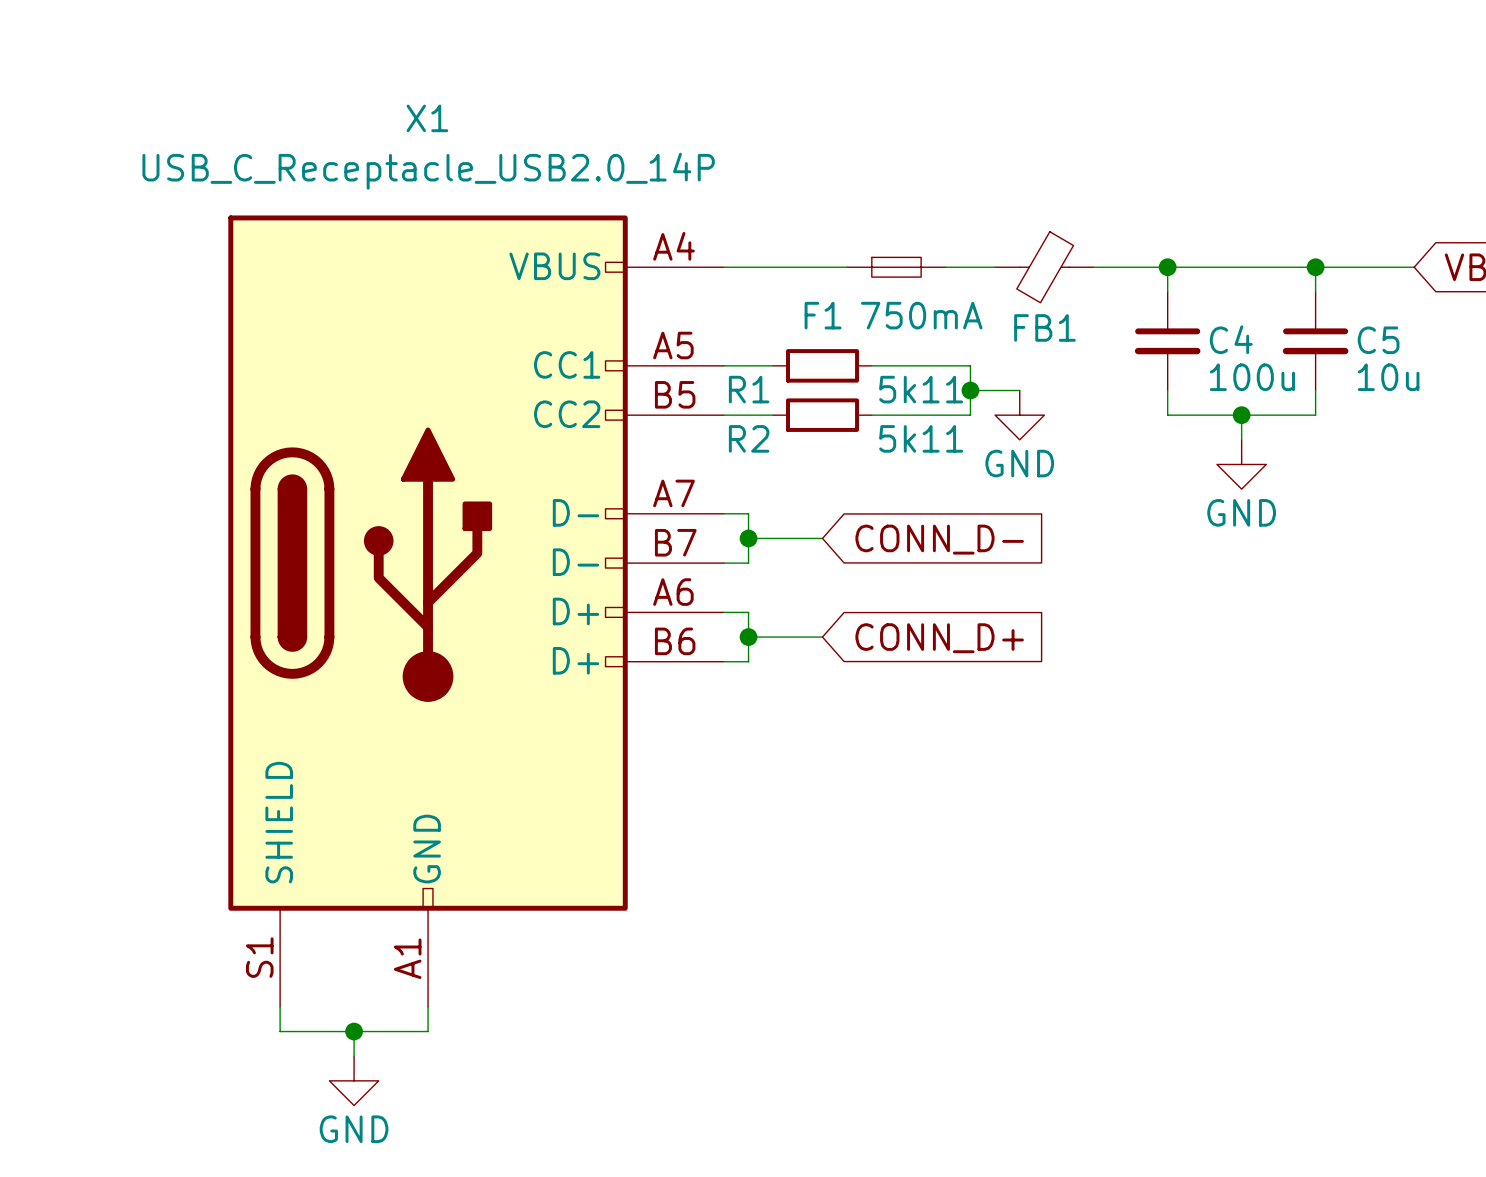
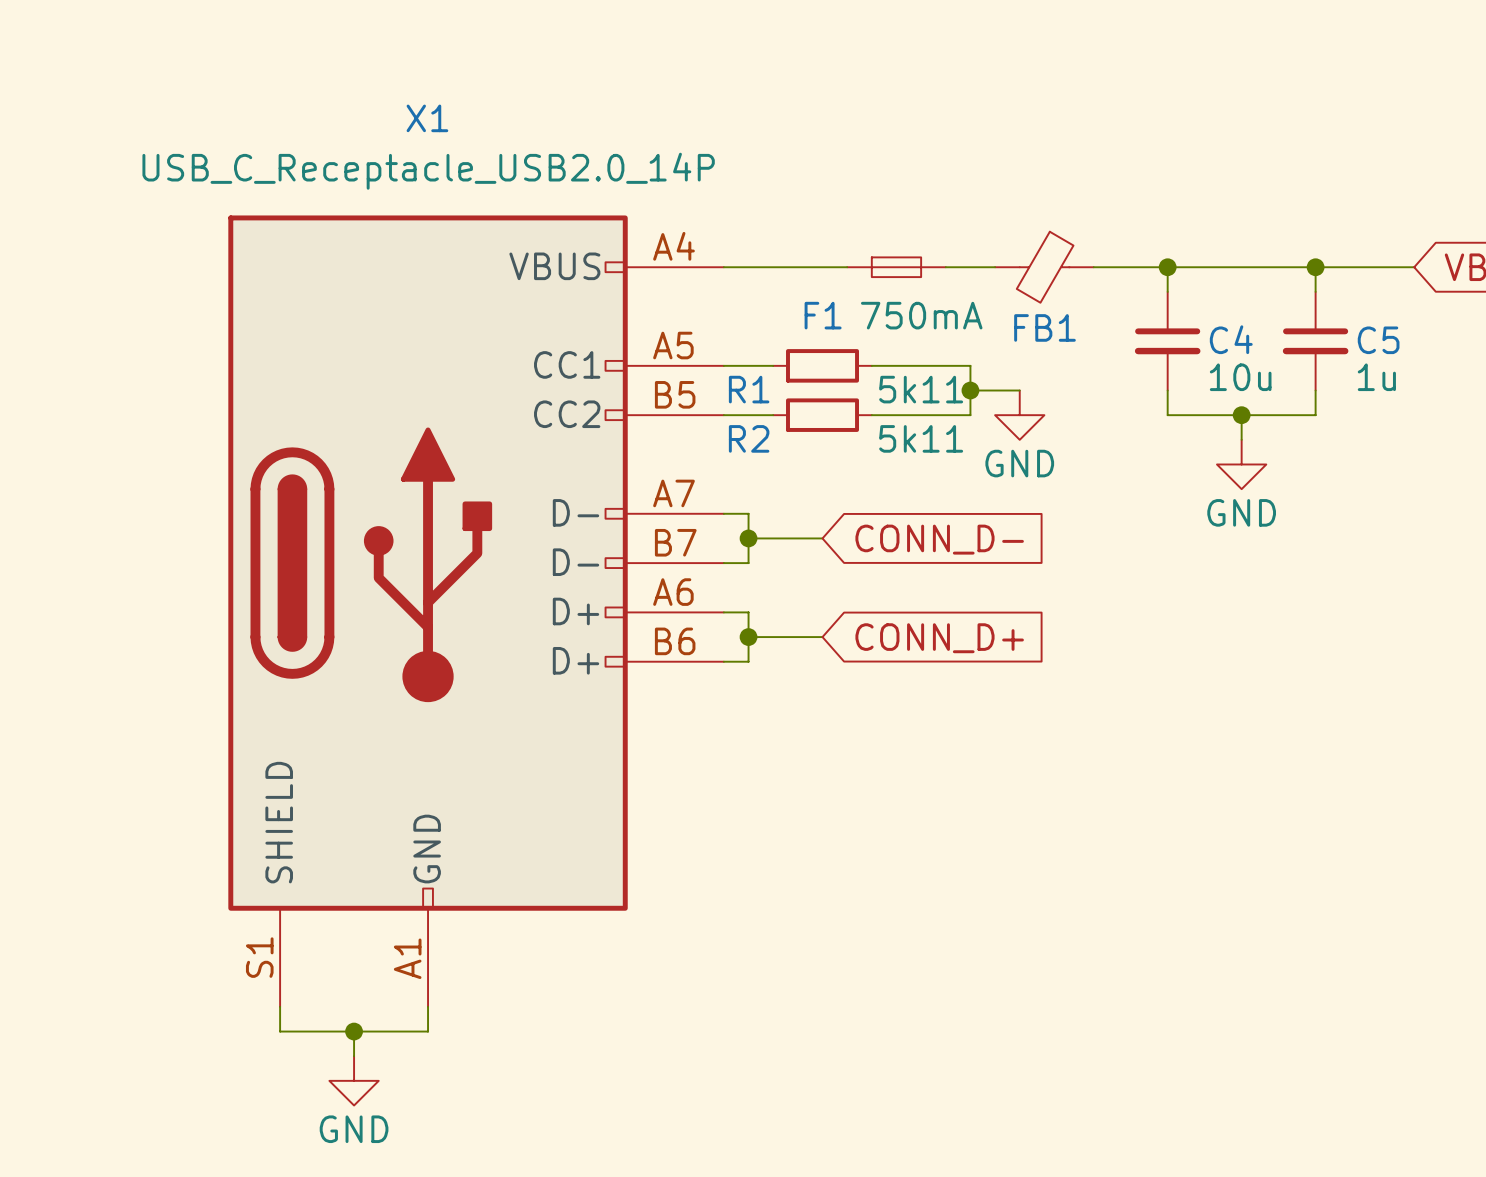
C4 value: 100u (1252, 377) -> 10u (1240, 377)
C5 value: 10u (1388, 377) -> 1u (1376, 377)

